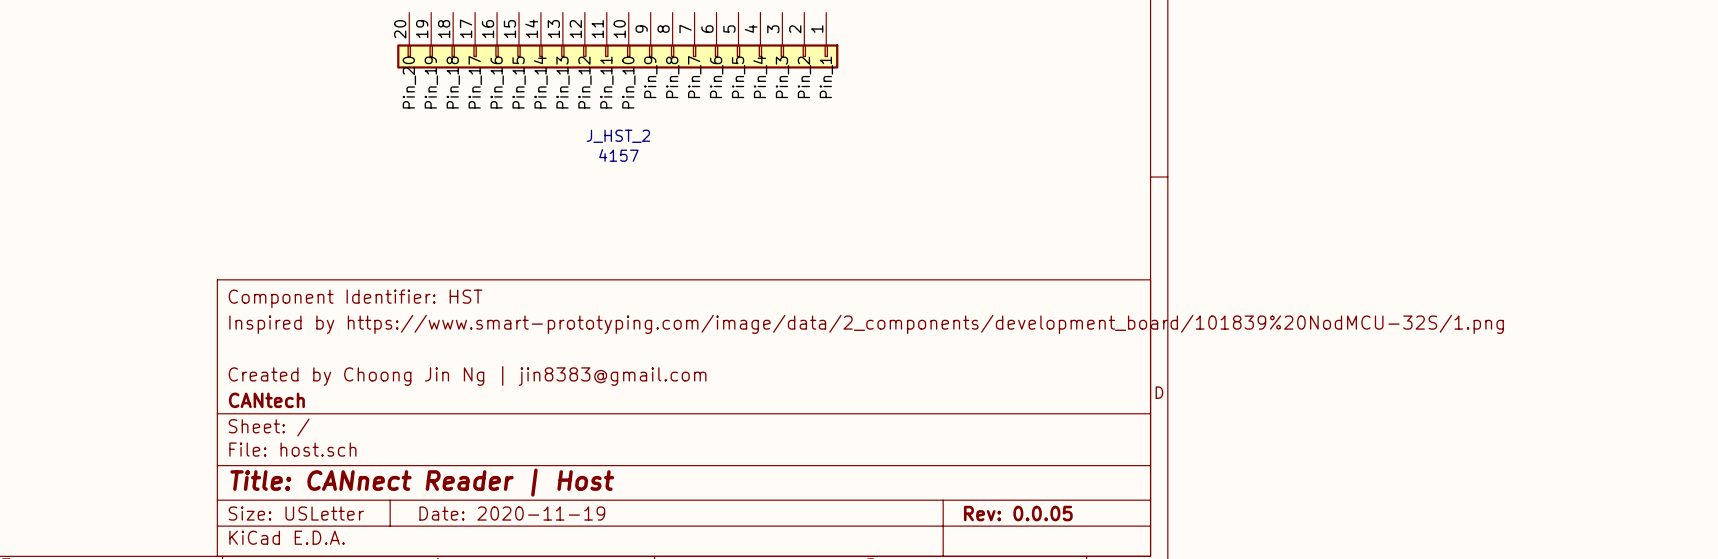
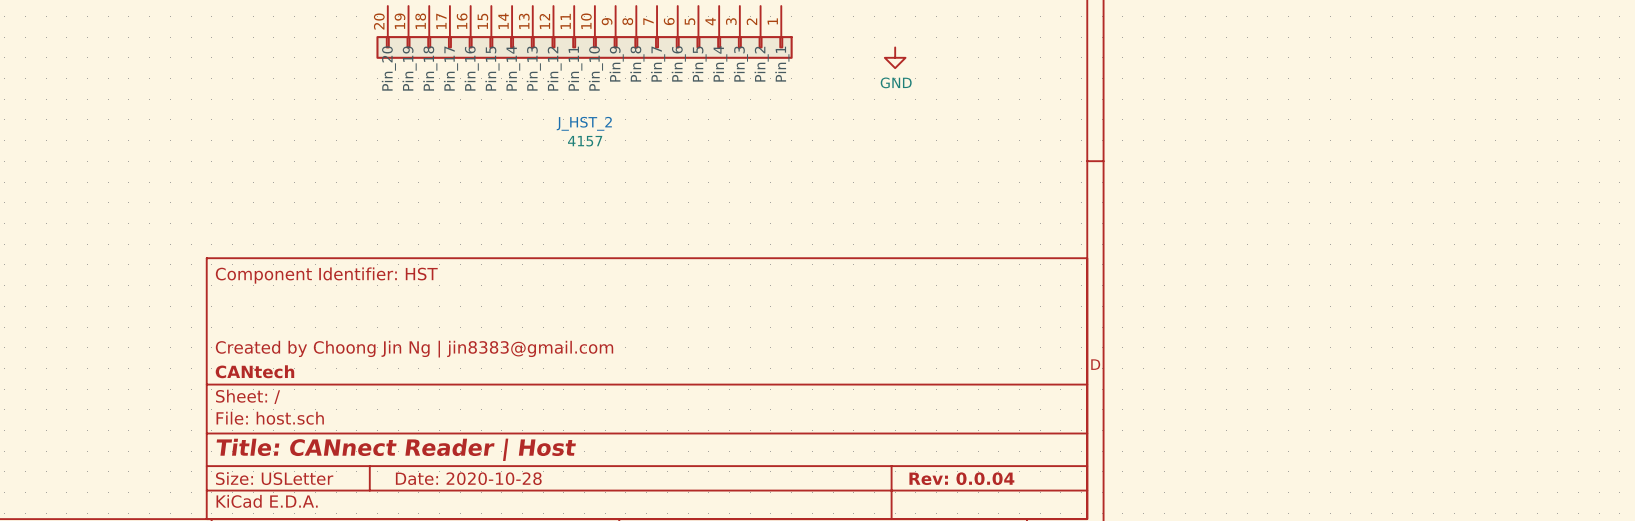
power symbol: none -> GND (895, 57)
title block: Inspired by https://www.smart-prototyping.com/image/data/2_components/development_board/101839%20NodMCU-32S/1.png (866, 324) -> none
title block: Date: 2020-11-19 (512, 513) -> Date: 2020-10-28 (468, 478)
title block: Rev: 0.0.05 (1018, 513) -> Rev: 0.0.04 (961, 478)

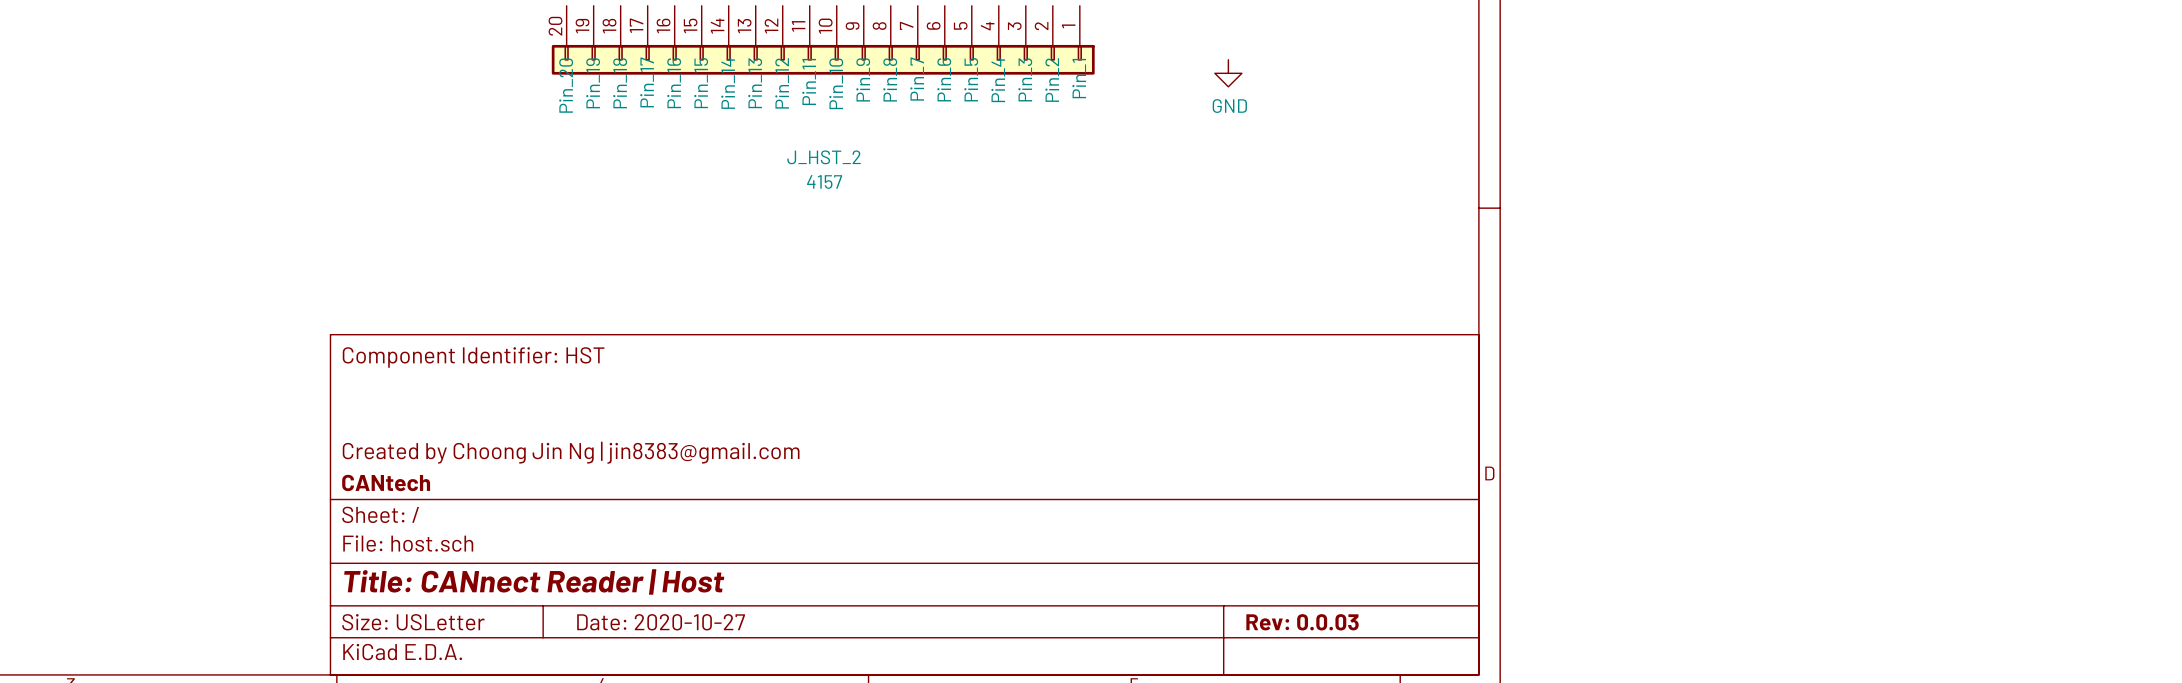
title block: Date: 2020-10-28 (468, 478) -> Date: 2020-10-27 (661, 622)
title block: Rev: 0.0.04 (961, 478) -> Rev: 0.0.03 (1302, 622)

